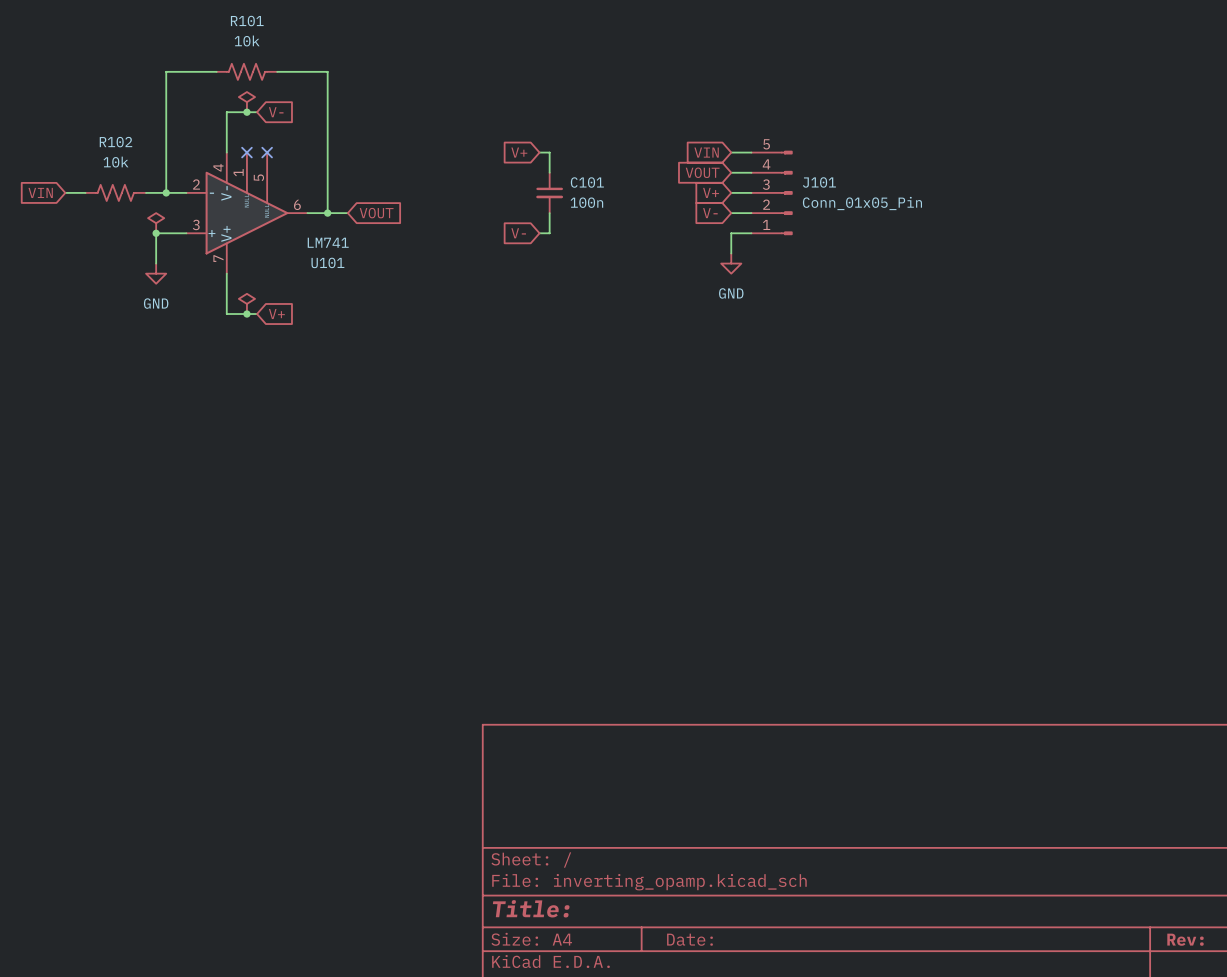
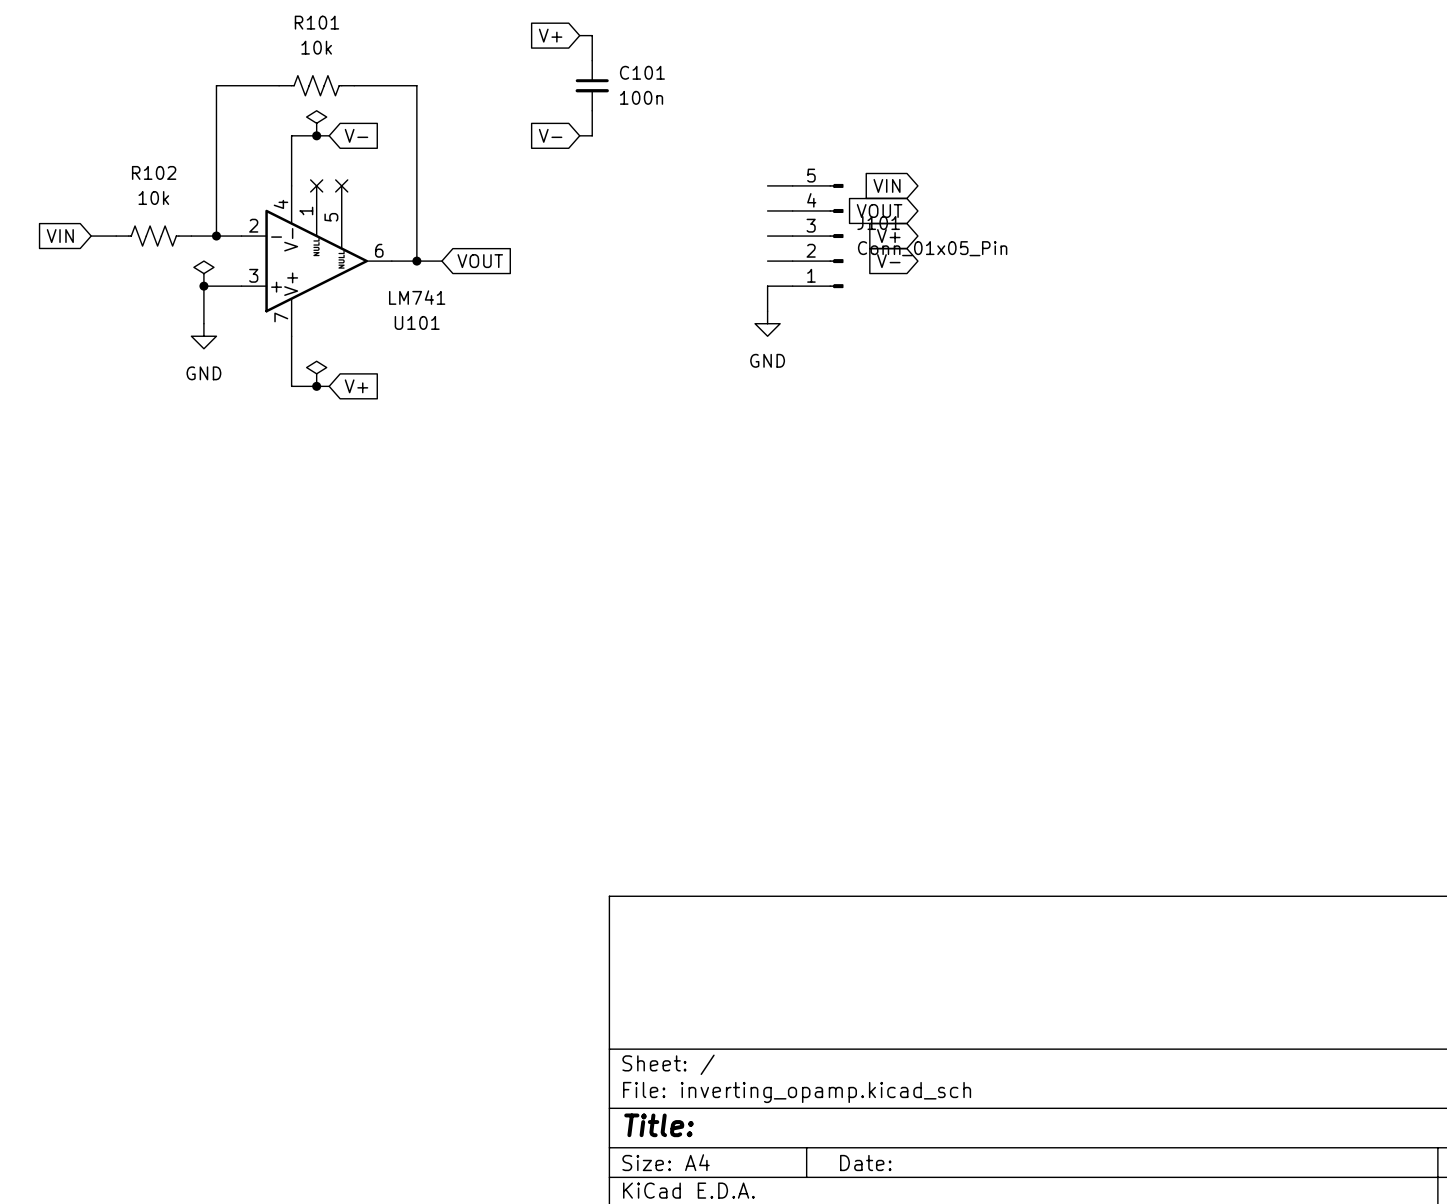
global label position: V+ (519, 152) -> V+ (550, 35)
wire: (539, 152) (549, 152) (549, 172) -> (579, 35) (592, 35) (592, 60)
wire: (731, 152) (751, 152) -> (767, 185) (792, 185)
wire: (731, 172) (751, 172) -> (767, 210) (792, 210)
C101 position: (549, 192) -> (592, 85)
wire: (731, 192) (751, 192) -> (767, 236) (792, 236)
J101 position: (771, 192) -> (818, 236)
wire: (549, 213) (549, 233) (539, 233) -> (592, 110) (592, 135) (579, 135)
wire: (731, 213) (751, 213) -> (767, 261) (792, 261)
global label position: V- (518, 233) -> V- (550, 135)
wire: (751, 233) (731, 233) (731, 253) -> (792, 286) (767, 286) (767, 311)
power symbol position: GND (731, 263) -> GND (767, 323)

